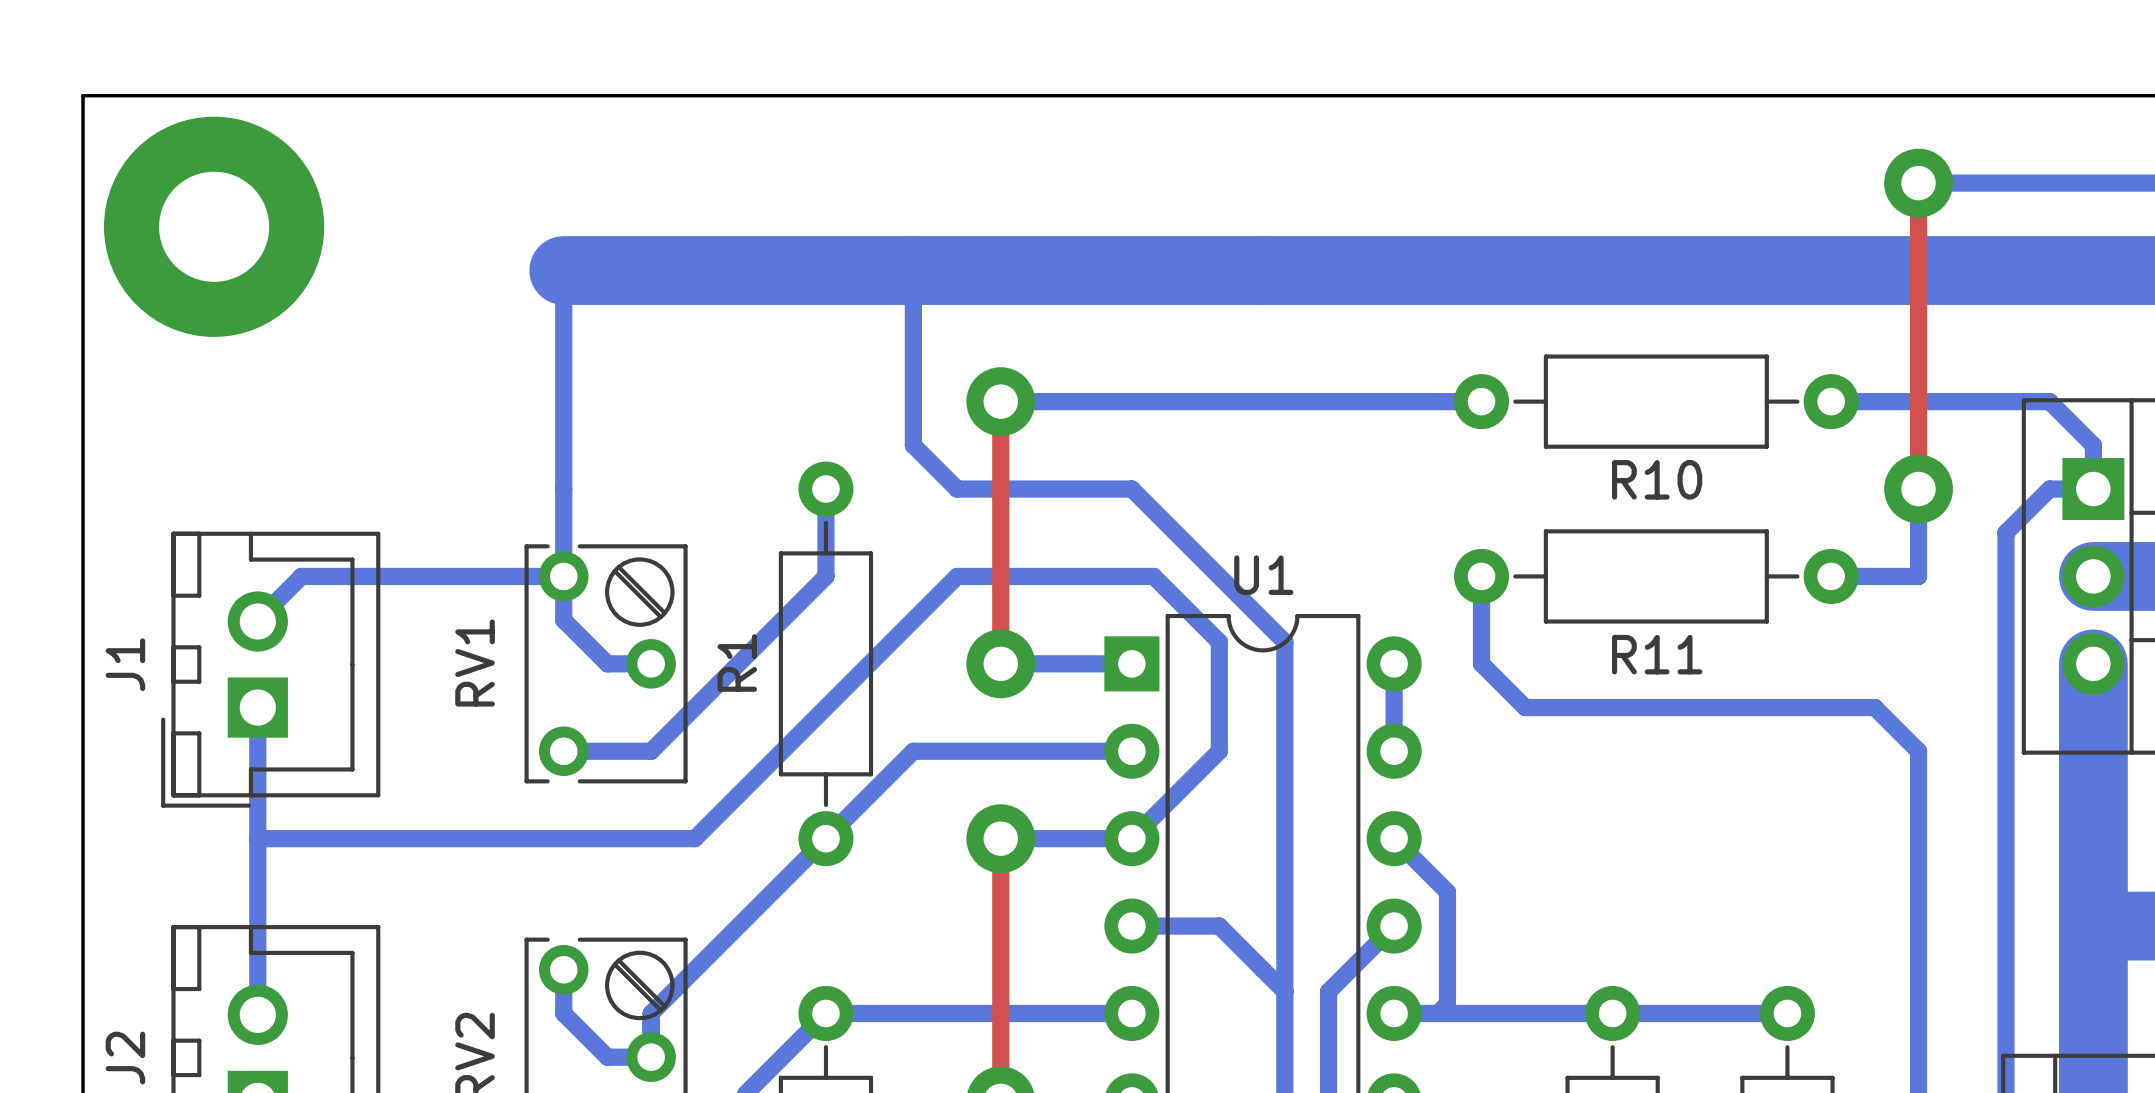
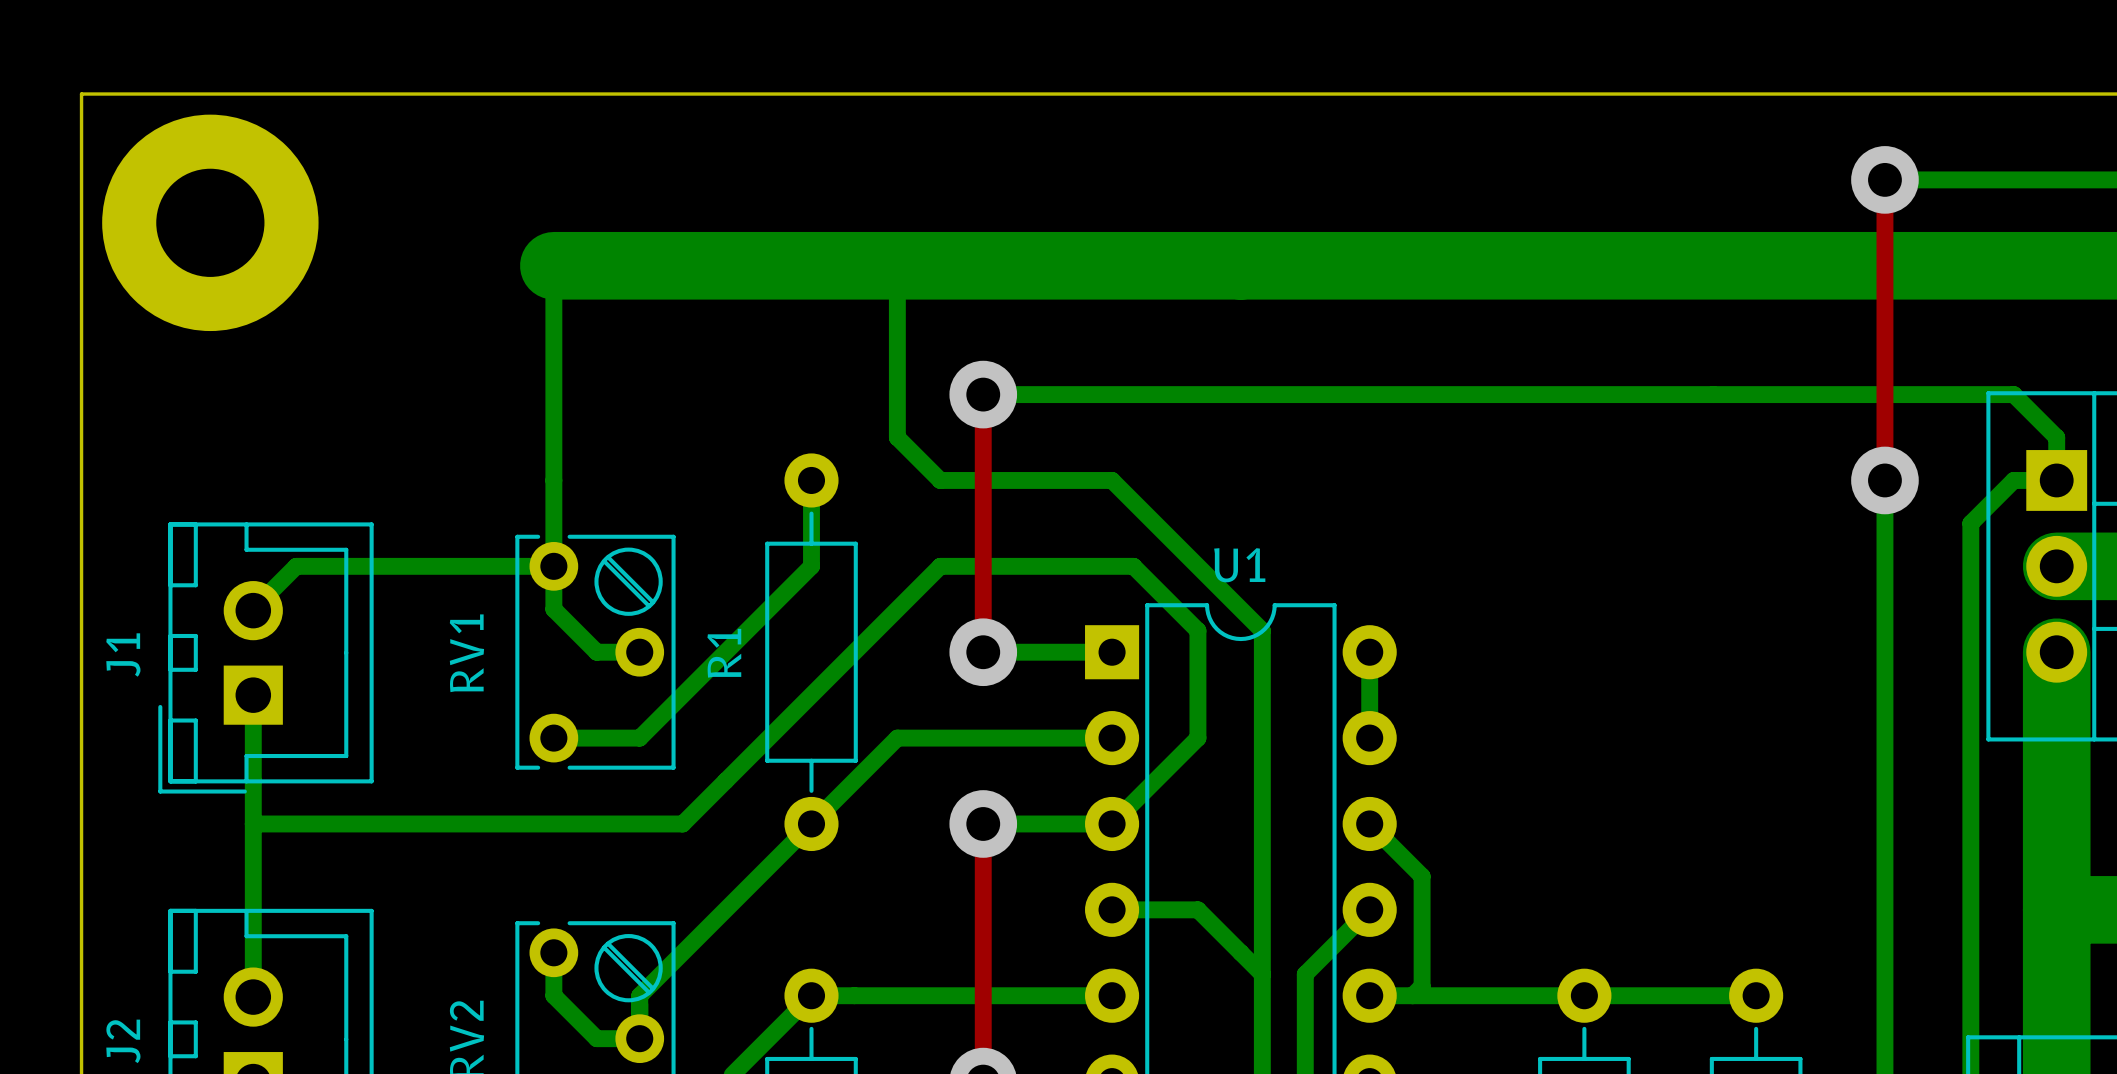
bottom track: none -> (1455, 394) (1799, 394)
R10: (1656, 401) -> none
bottom track: (1481, 576) (1481, 663) (1525, 707) (1874, 707) (1918, 751) -> none
R11: (1656, 576) -> none
bottom track: (1831, 576) (1918, 576) -> (1884, 738) (1884, 566)

